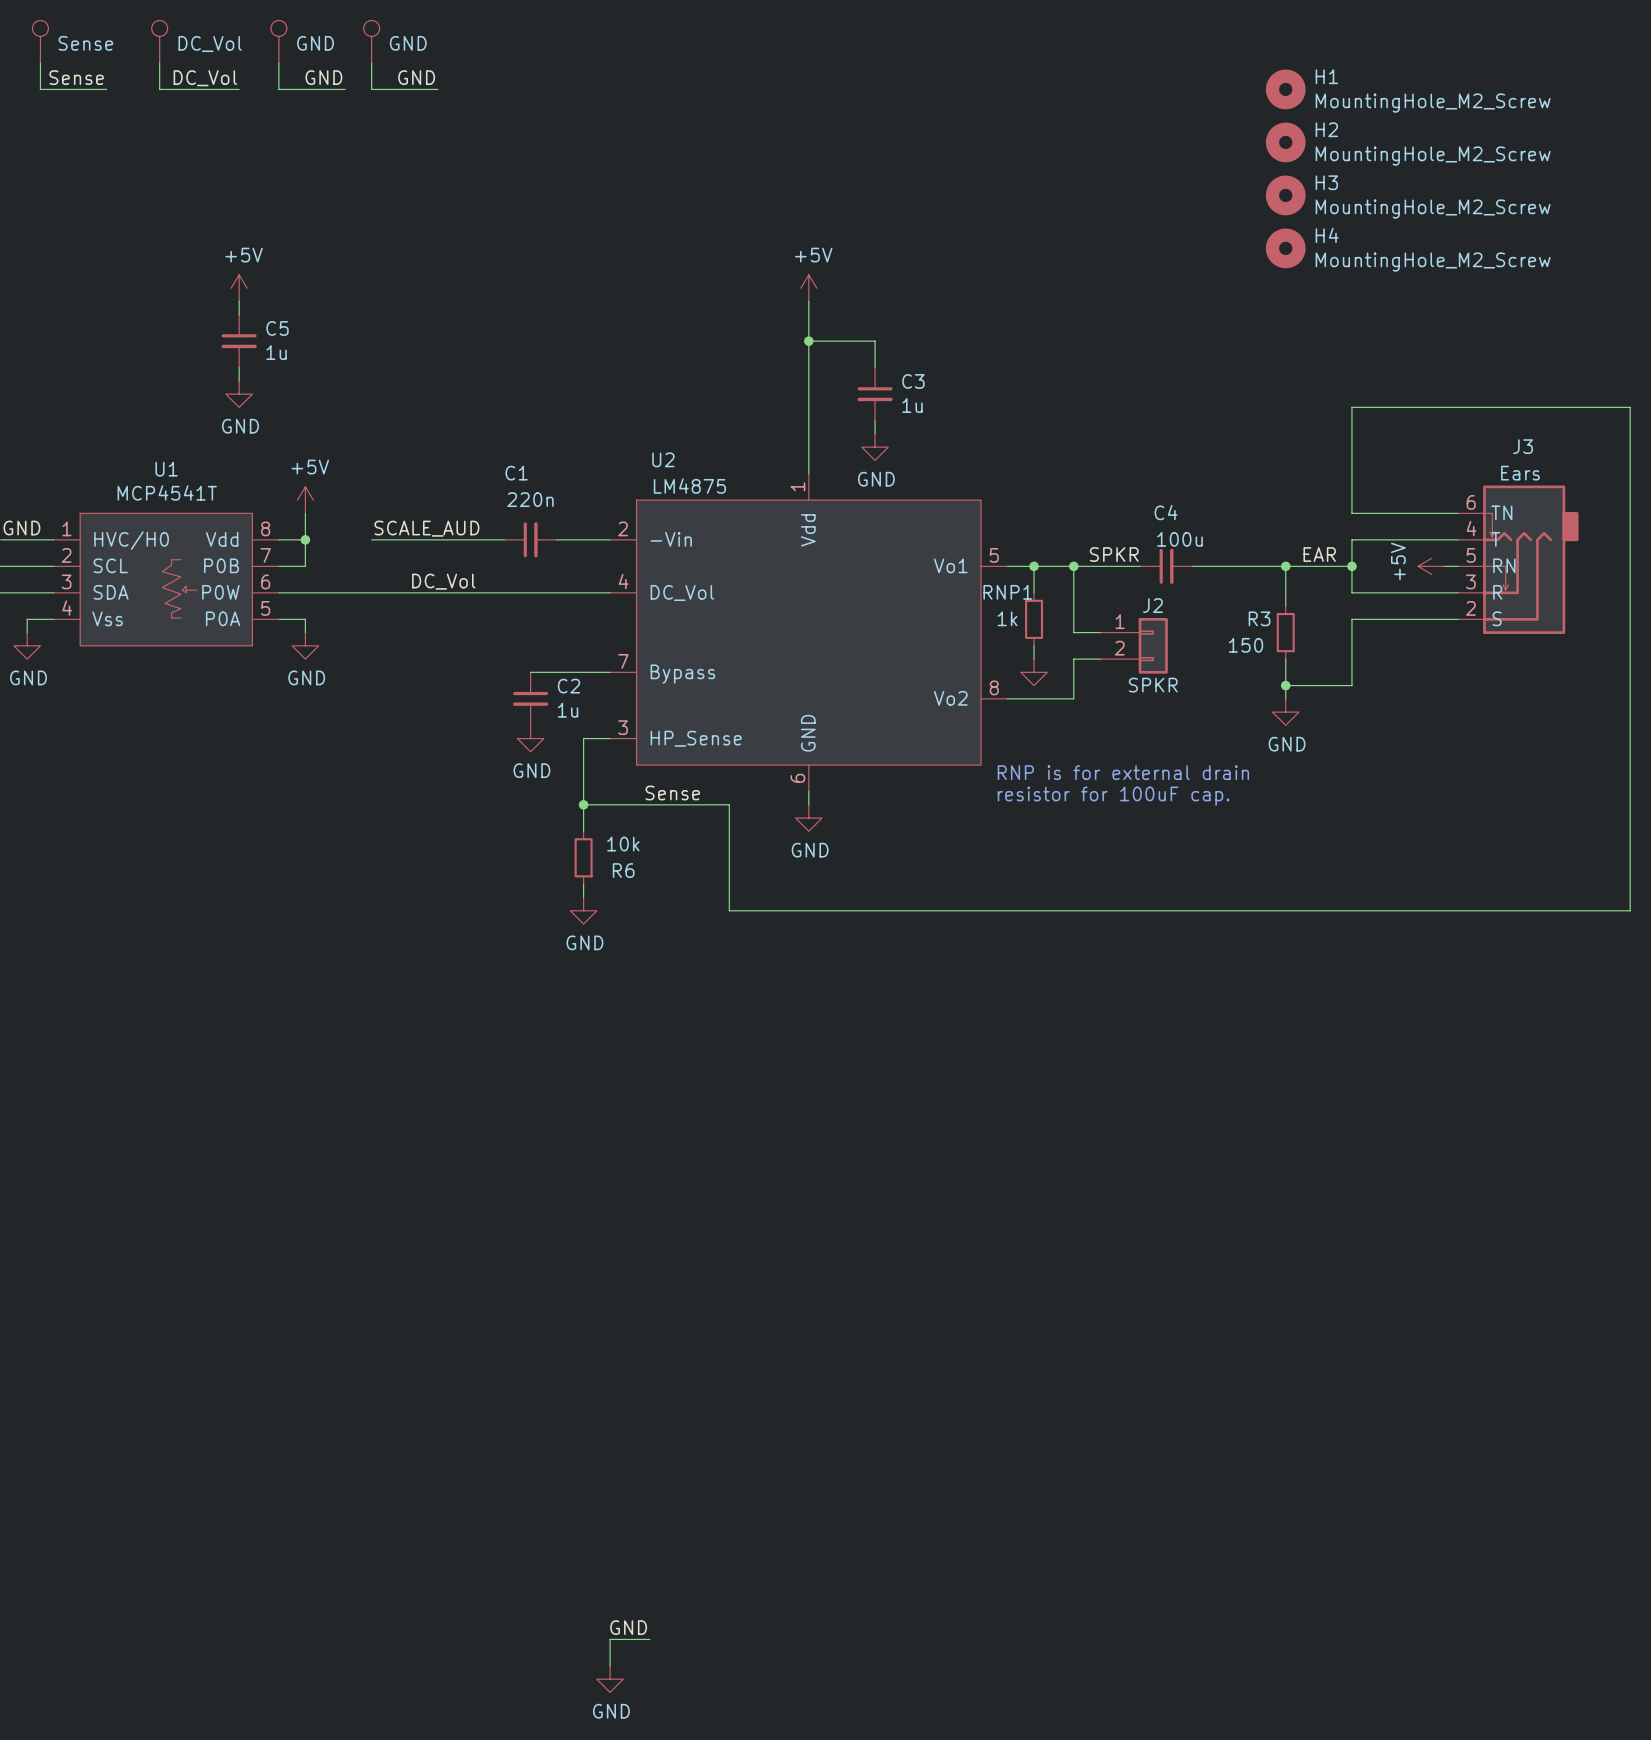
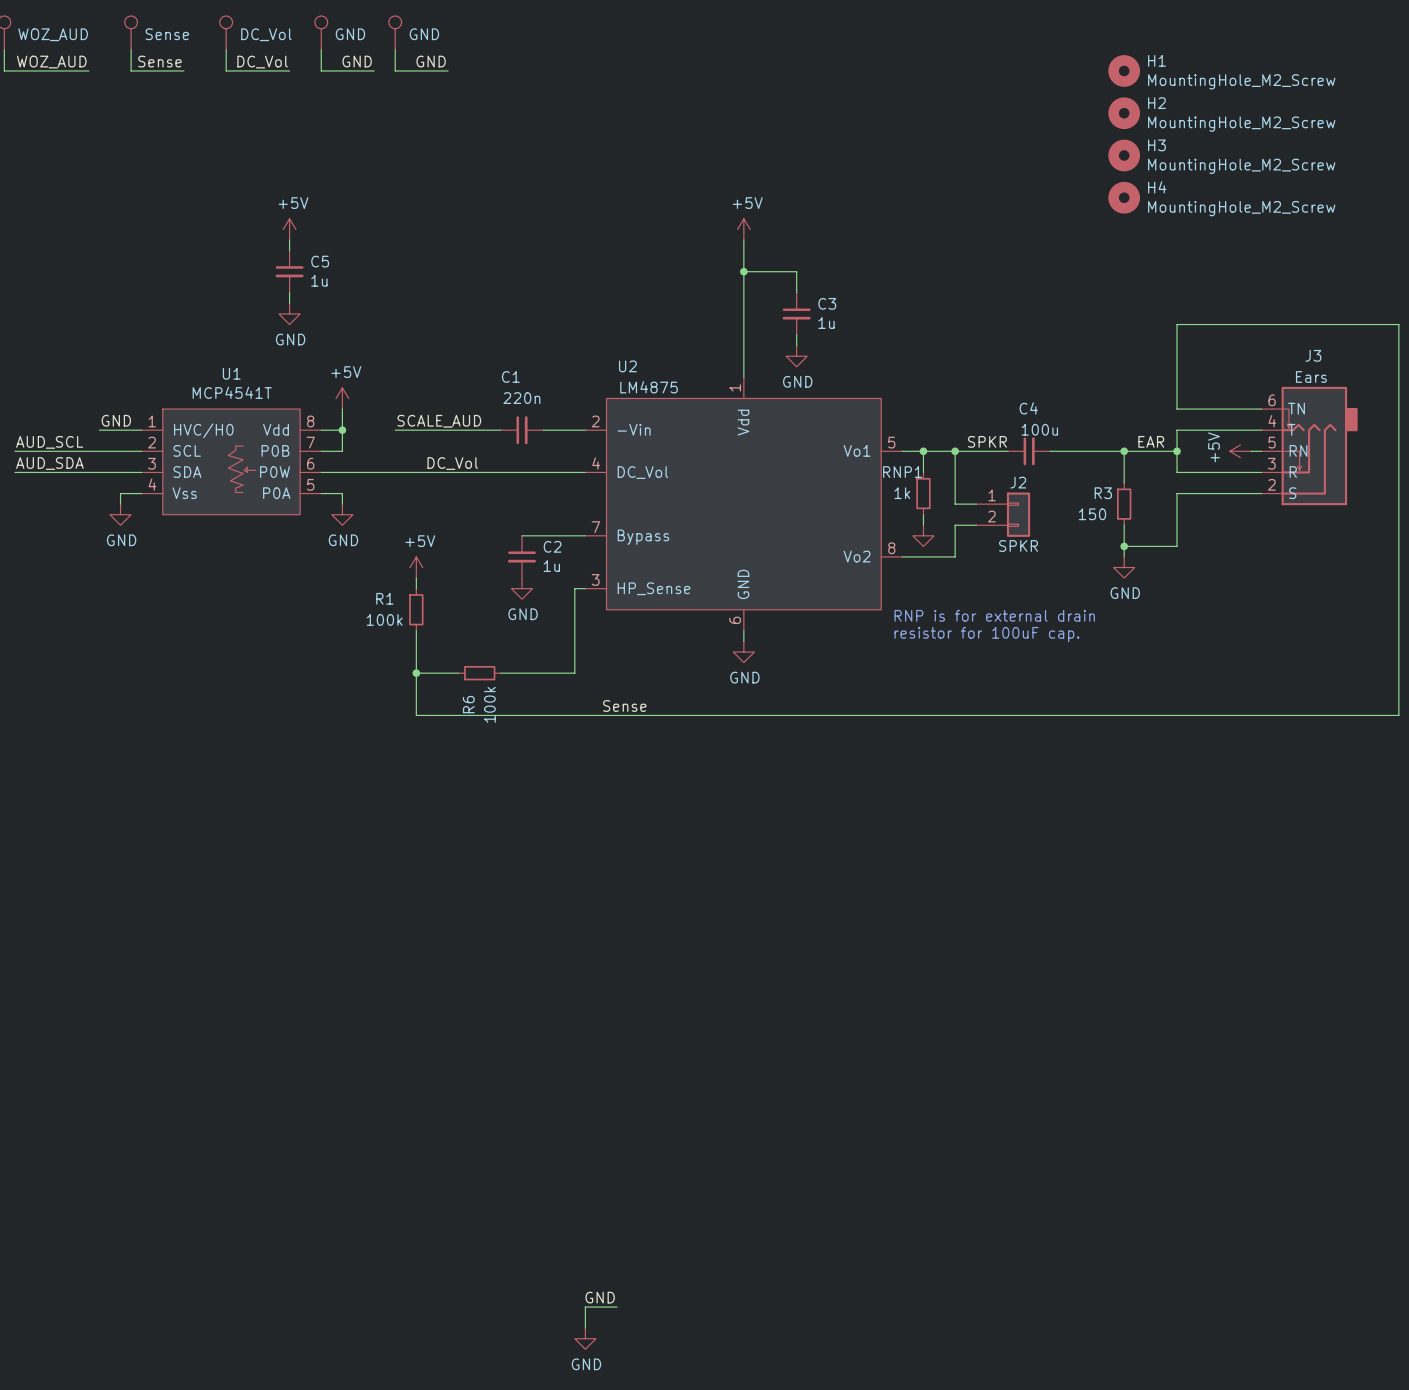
power symbol: none -> +5V (416, 567)
wire: (596, 738) (583, 738) (583, 831) -> (574, 588) (574, 673) (500, 673)
R1: none -> 100k (416, 609)
label position: Sense (672, 792) -> Sense (624, 705)
wire: (583, 804) (729, 804) (729, 910) (1630, 910) (1630, 897) -> (416, 630) (416, 715) (1398, 715)
junction: (583, 804) -> none
wire: none -> (416, 673) (458, 673)
junction: none -> (416, 673)
R6 value: 10k (623, 844) -> 100k (489, 704)
R6 rotation: 0° (583, 857) -> 90° clockwise (479, 673)
R6 position: (583, 857) -> (479, 673)
wire: (583, 884) (583, 897) -> (416, 578) (416, 588)
power symbol: GND (583, 910) -> none

